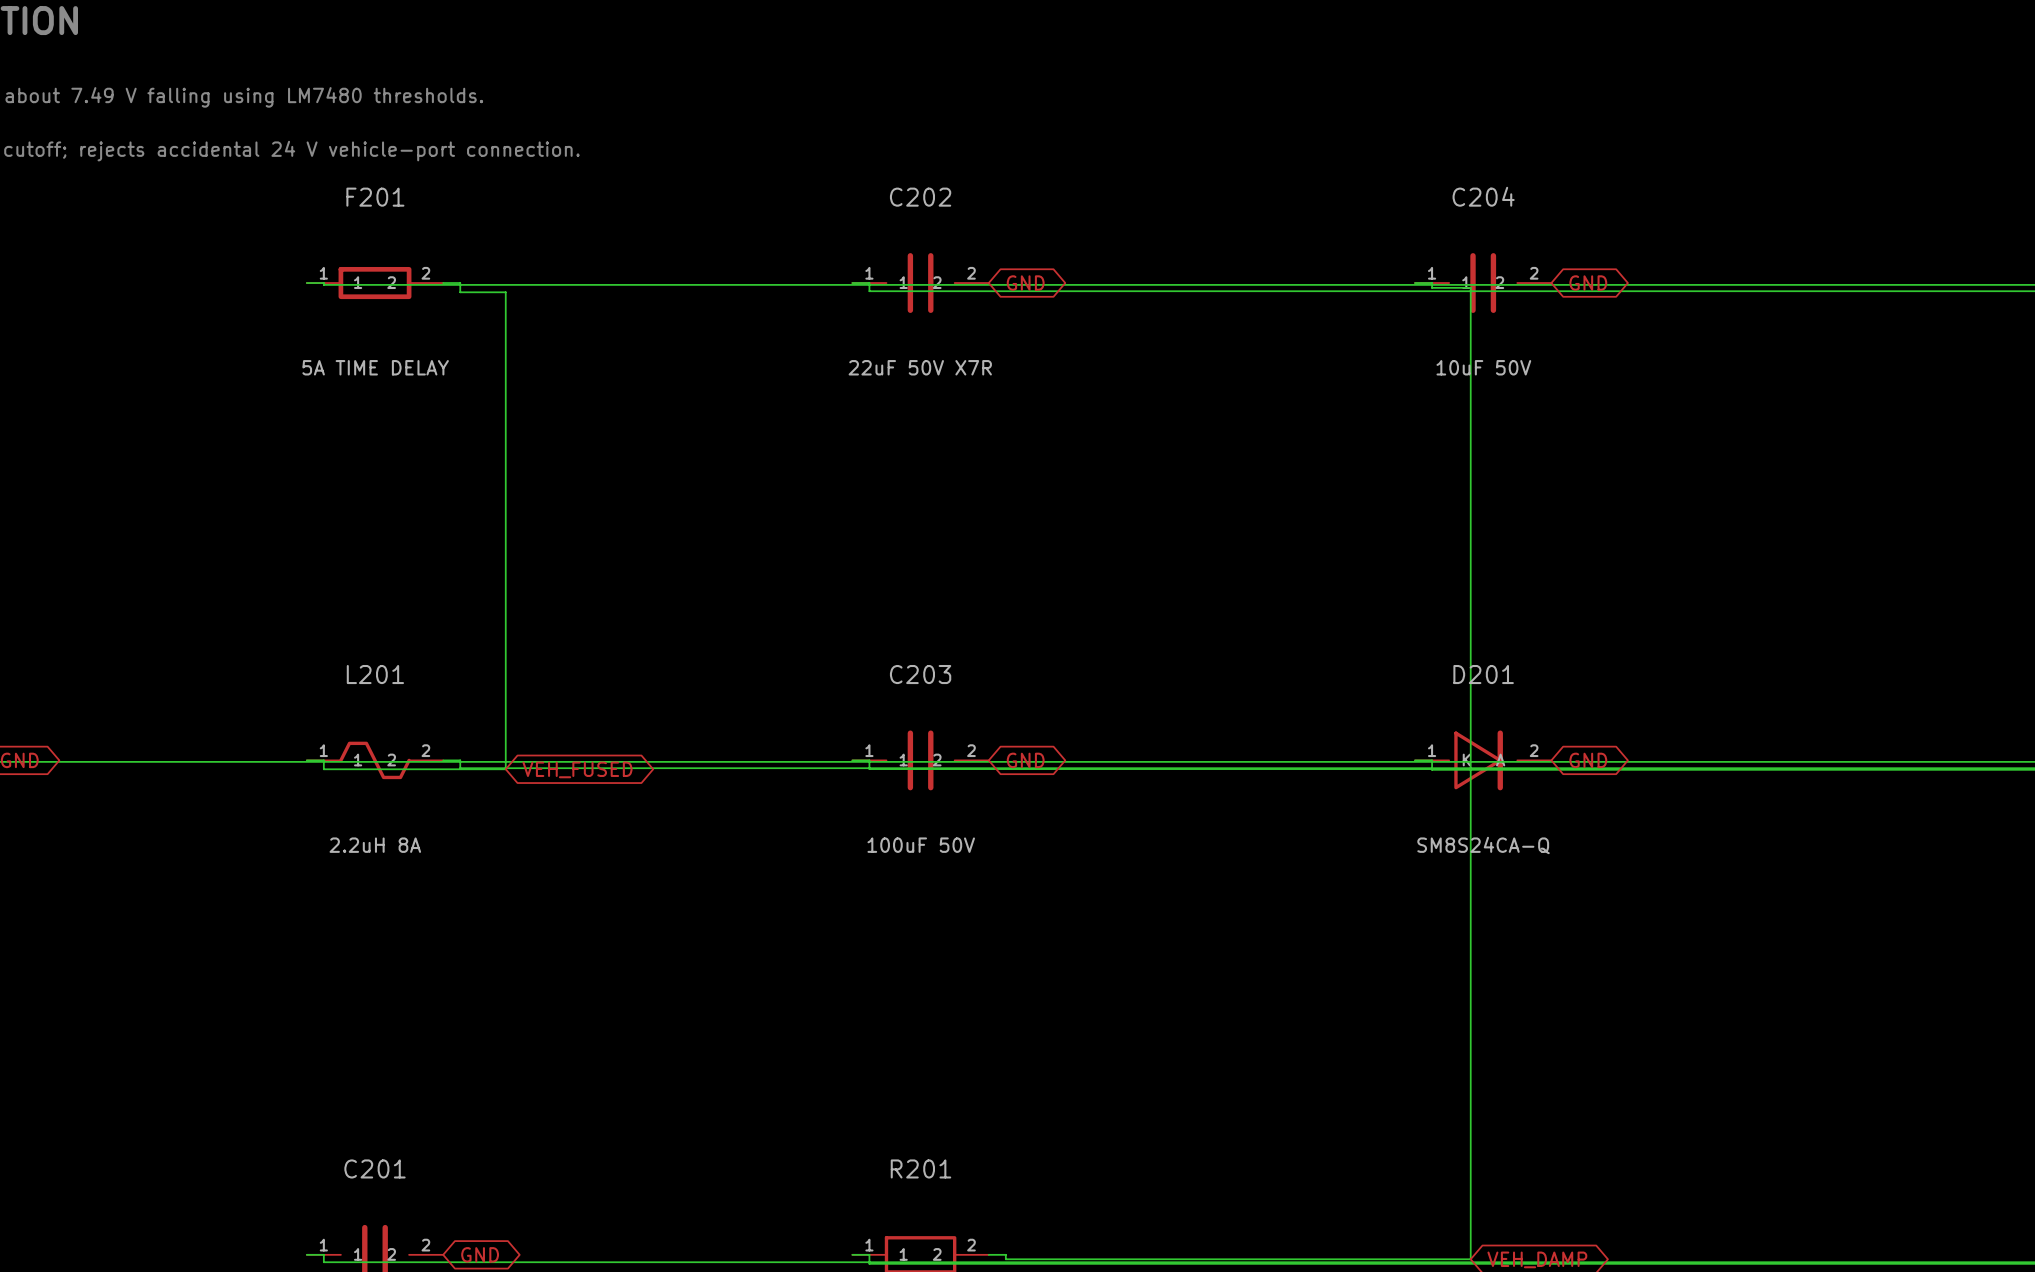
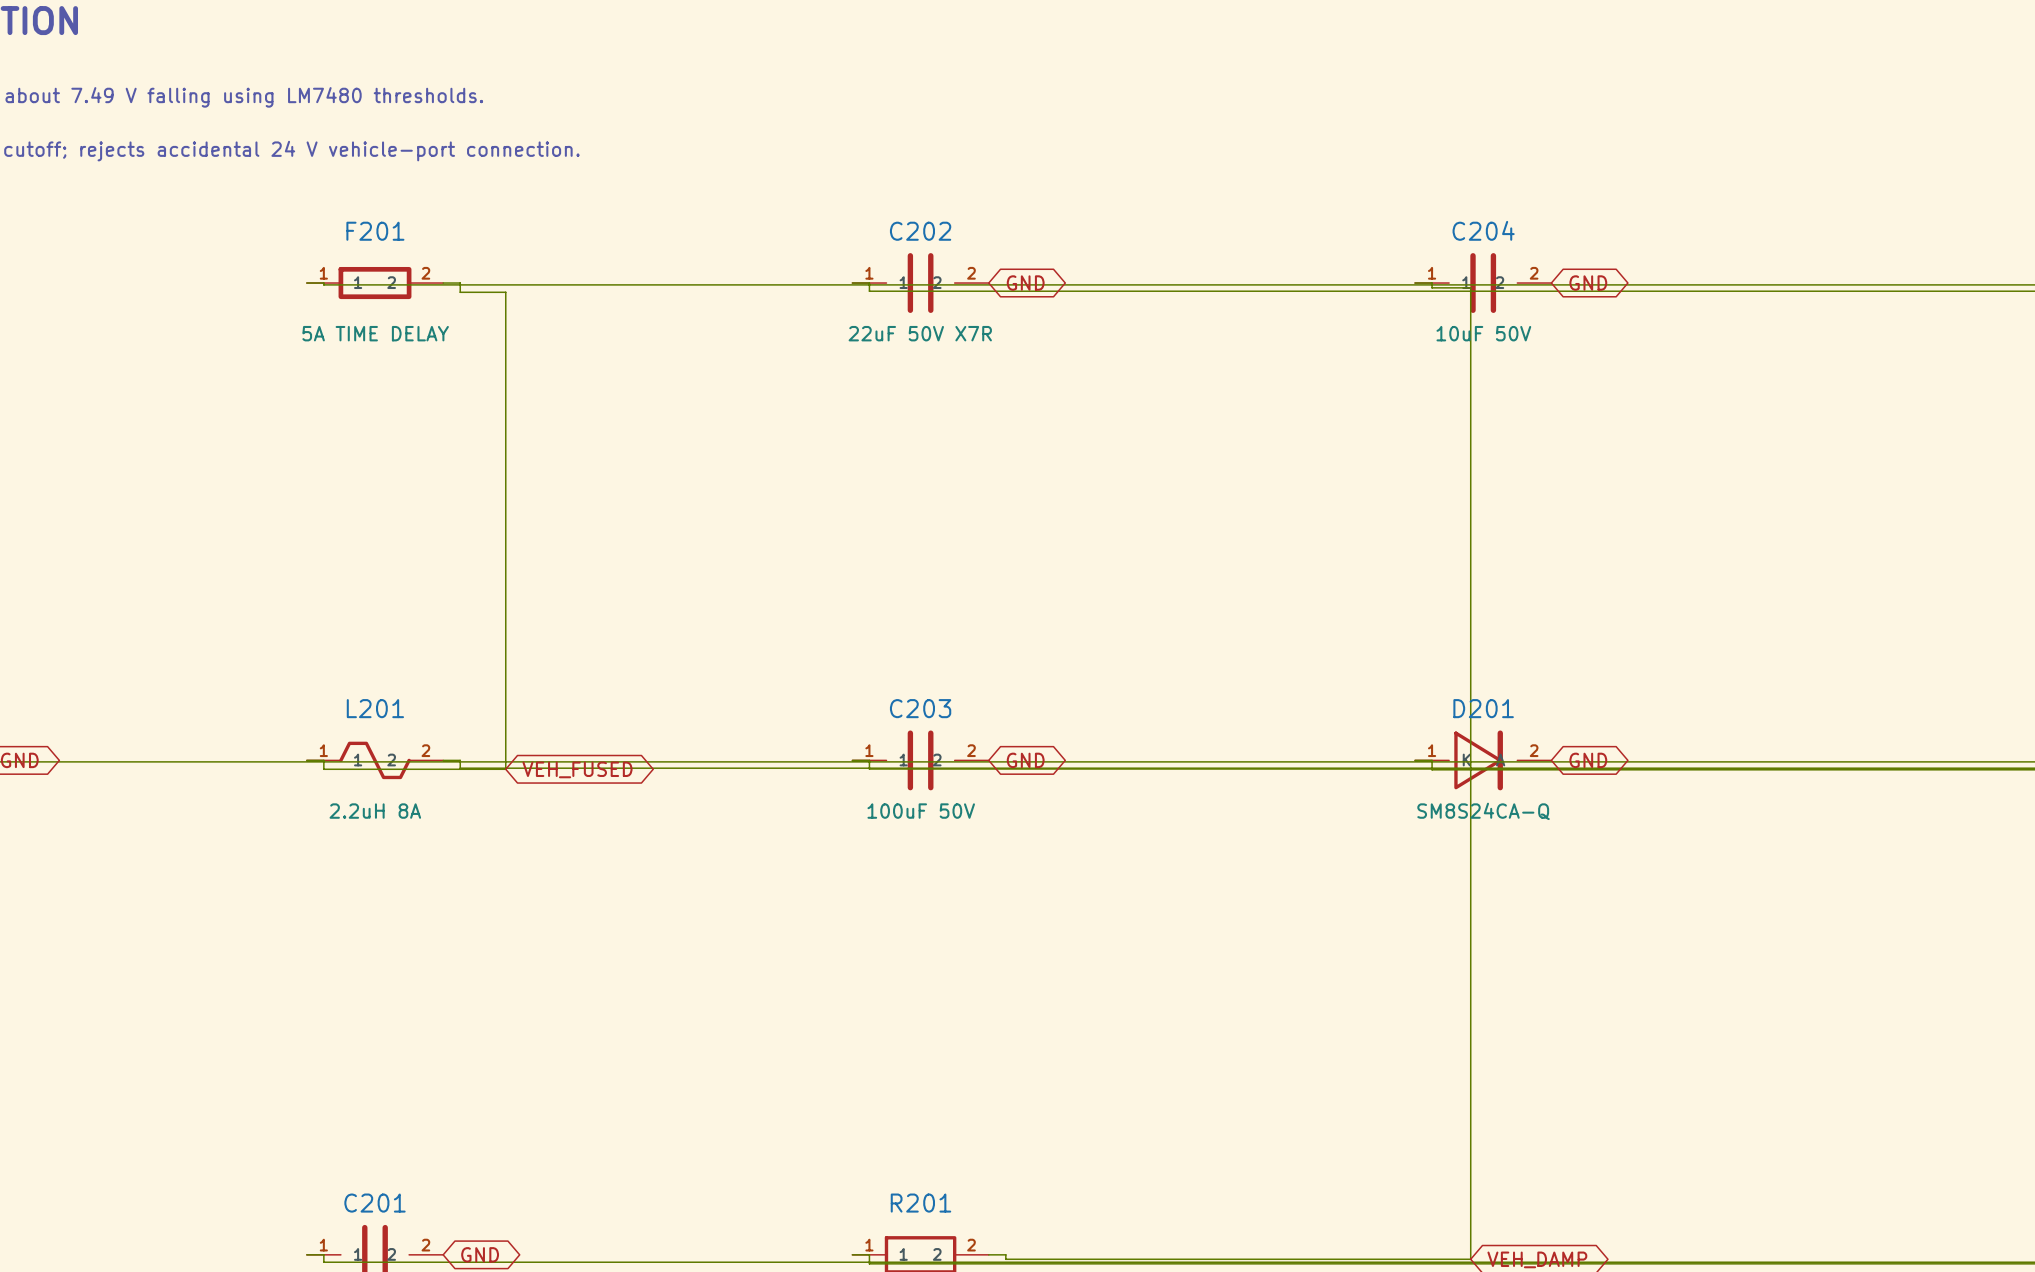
C204 name position: C204 (1483, 196) -> C204 (1483, 230)
F201 name position: F201 (375, 197) -> F201 (375, 231)
C202 name position: C202 (920, 197) -> C202 (920, 231)
F201 value position: 5A TIME DELAY (375, 367) -> 5A TIME DELAY (375, 333)
C202 value position: 22uF 50V X7R (920, 367) -> 22uF 50V X7R (920, 333)
C204 value position: 10uF 50V (1483, 367) -> 10uF 50V (1483, 333)
L201 name position: L201 (375, 674) -> L201 (375, 708)
C203 name position: C203 (920, 674) -> C203 (920, 708)
D201 name position: D201 (1483, 674) -> D201 (1483, 708)
L201 value position: 2.2uH 8A (375, 845) -> 2.2uH 8A (375, 811)
C203 value position: 100uF 50V (921, 845) -> 100uF 50V (921, 811)
D201 value position: SM8S24CA-Q (1483, 845) -> SM8S24CA-Q (1483, 811)
C201 name position: C201 (375, 1168) -> C201 (375, 1203)
R201 name position: R201 (920, 1168) -> R201 (920, 1203)

